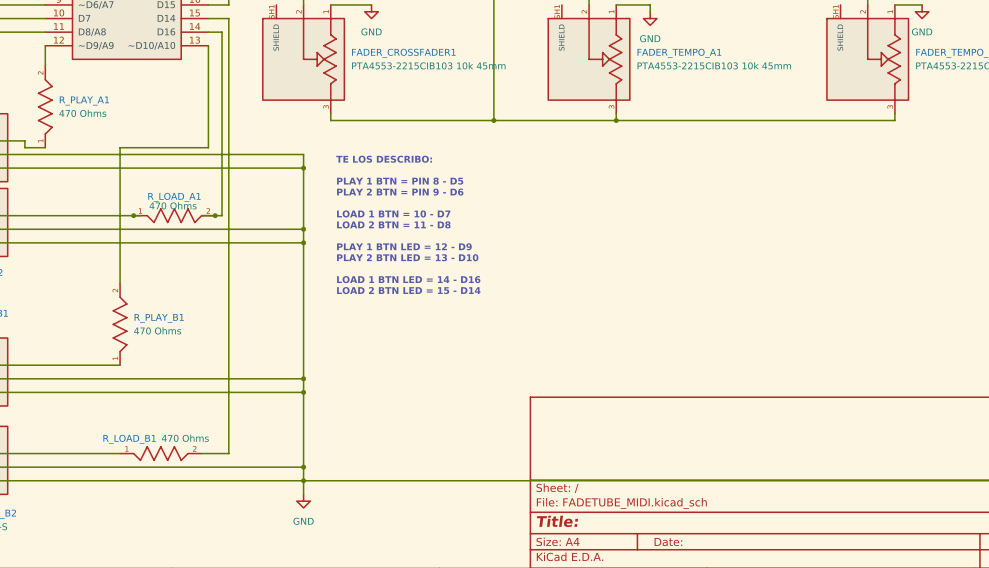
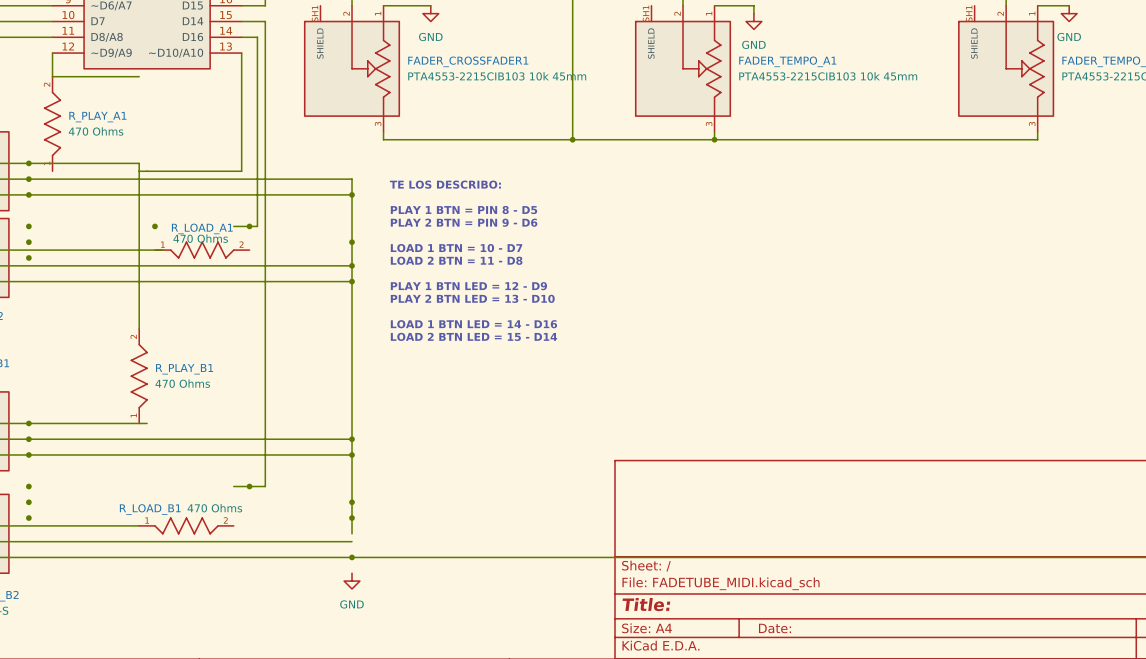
wire: none -> (52, 76) (139, 76)
wire: (24, 140) (24, 147) (45, 147) -> (28, 163) (139, 163) (139, 171)
junction: none -> (28, 163)
junction: none -> (28, 179)
junction: none -> (28, 194)
junction: none -> (28, 226)
wire: (222, 195) (222, 215) (201, 215) -> (257, 226) (233, 226)
junction: none -> (28, 242)
junction: none -> (352, 242)
junction position: (133, 215) -> (154, 226)
junction position: (215, 215) -> (249, 226)
junction: none -> (28, 257)
junction: none -> (28, 423)
wire: none -> (139, 423) (147, 423)
junction: none -> (28, 439)
junction: none -> (28, 454)
junction: none -> (28, 486)
junction: none -> (249, 486)
wire: (228, 419) (228, 453) (201, 453) -> (265, 486) (233, 486)
junction: none -> (28, 502)
junction: none -> (352, 502)
junction: none -> (28, 518)
junction: none -> (352, 518)
wire: (303, 460) (303, 494) -> none
junction: (303, 467) -> none

